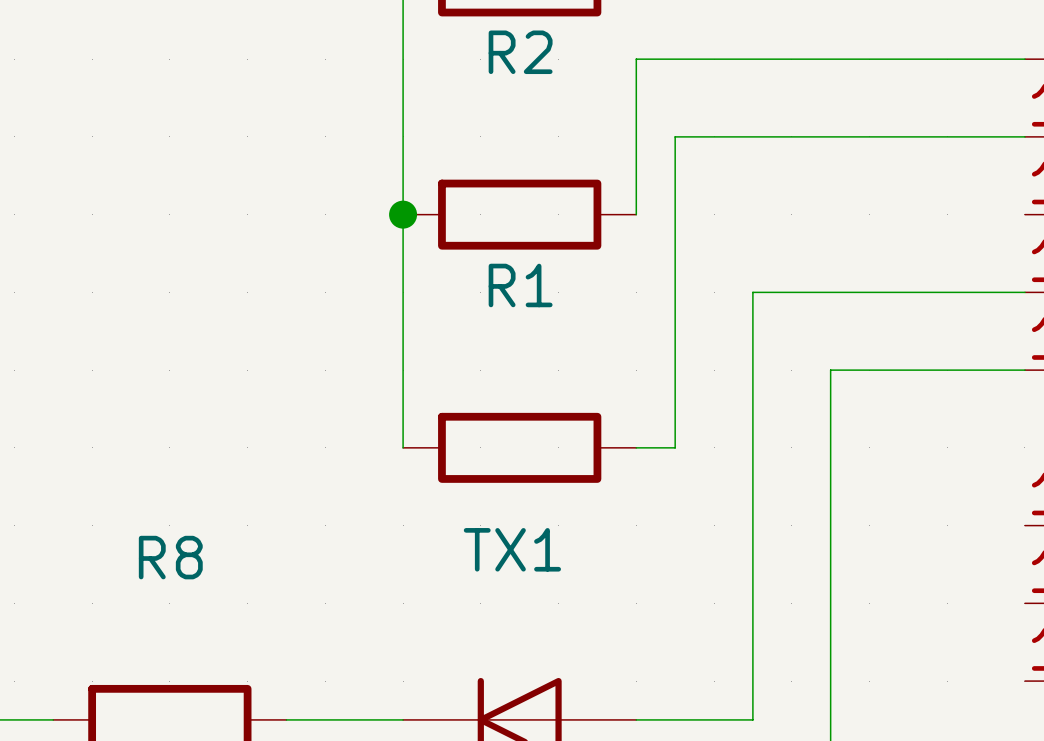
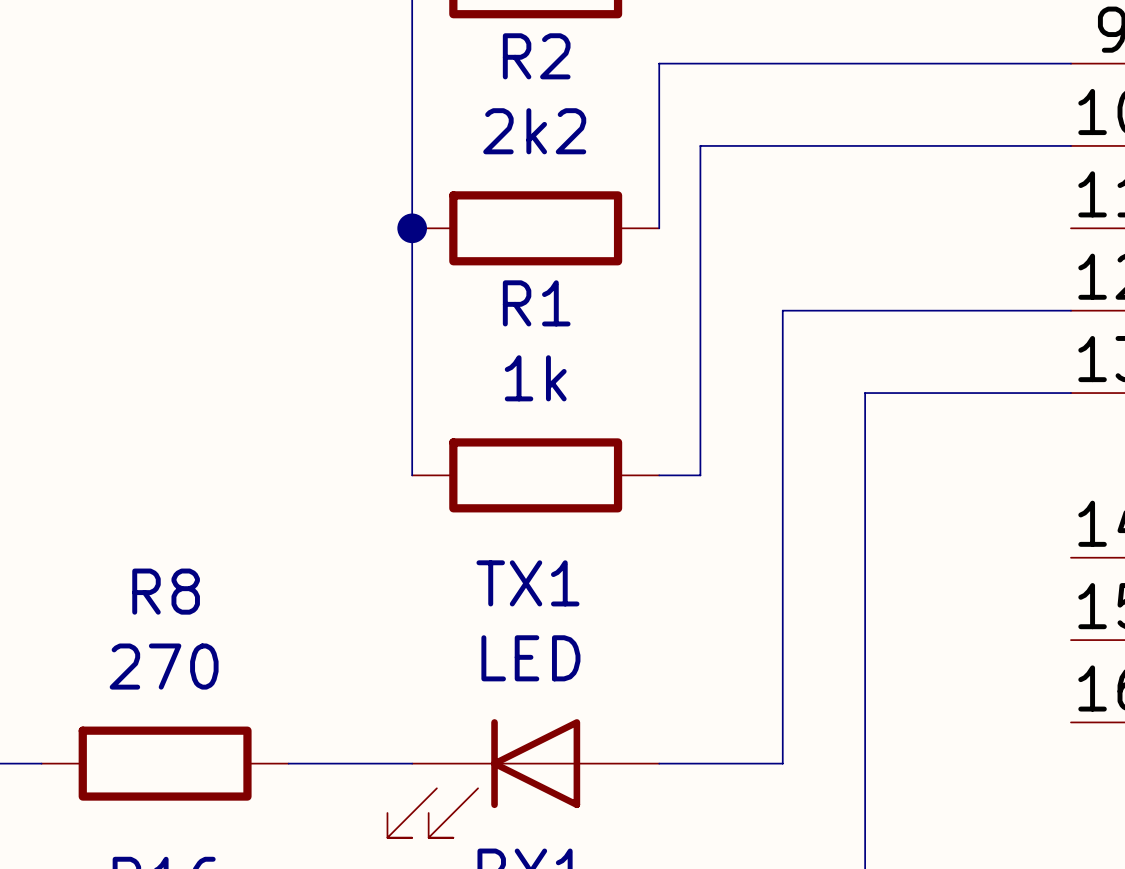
R2 value: none -> 2k2 (534, 131)
R1 value: none -> 1k (535, 378)
TX1 value: none -> LED (530, 658)
R8 value: none -> 270 (164, 666)

